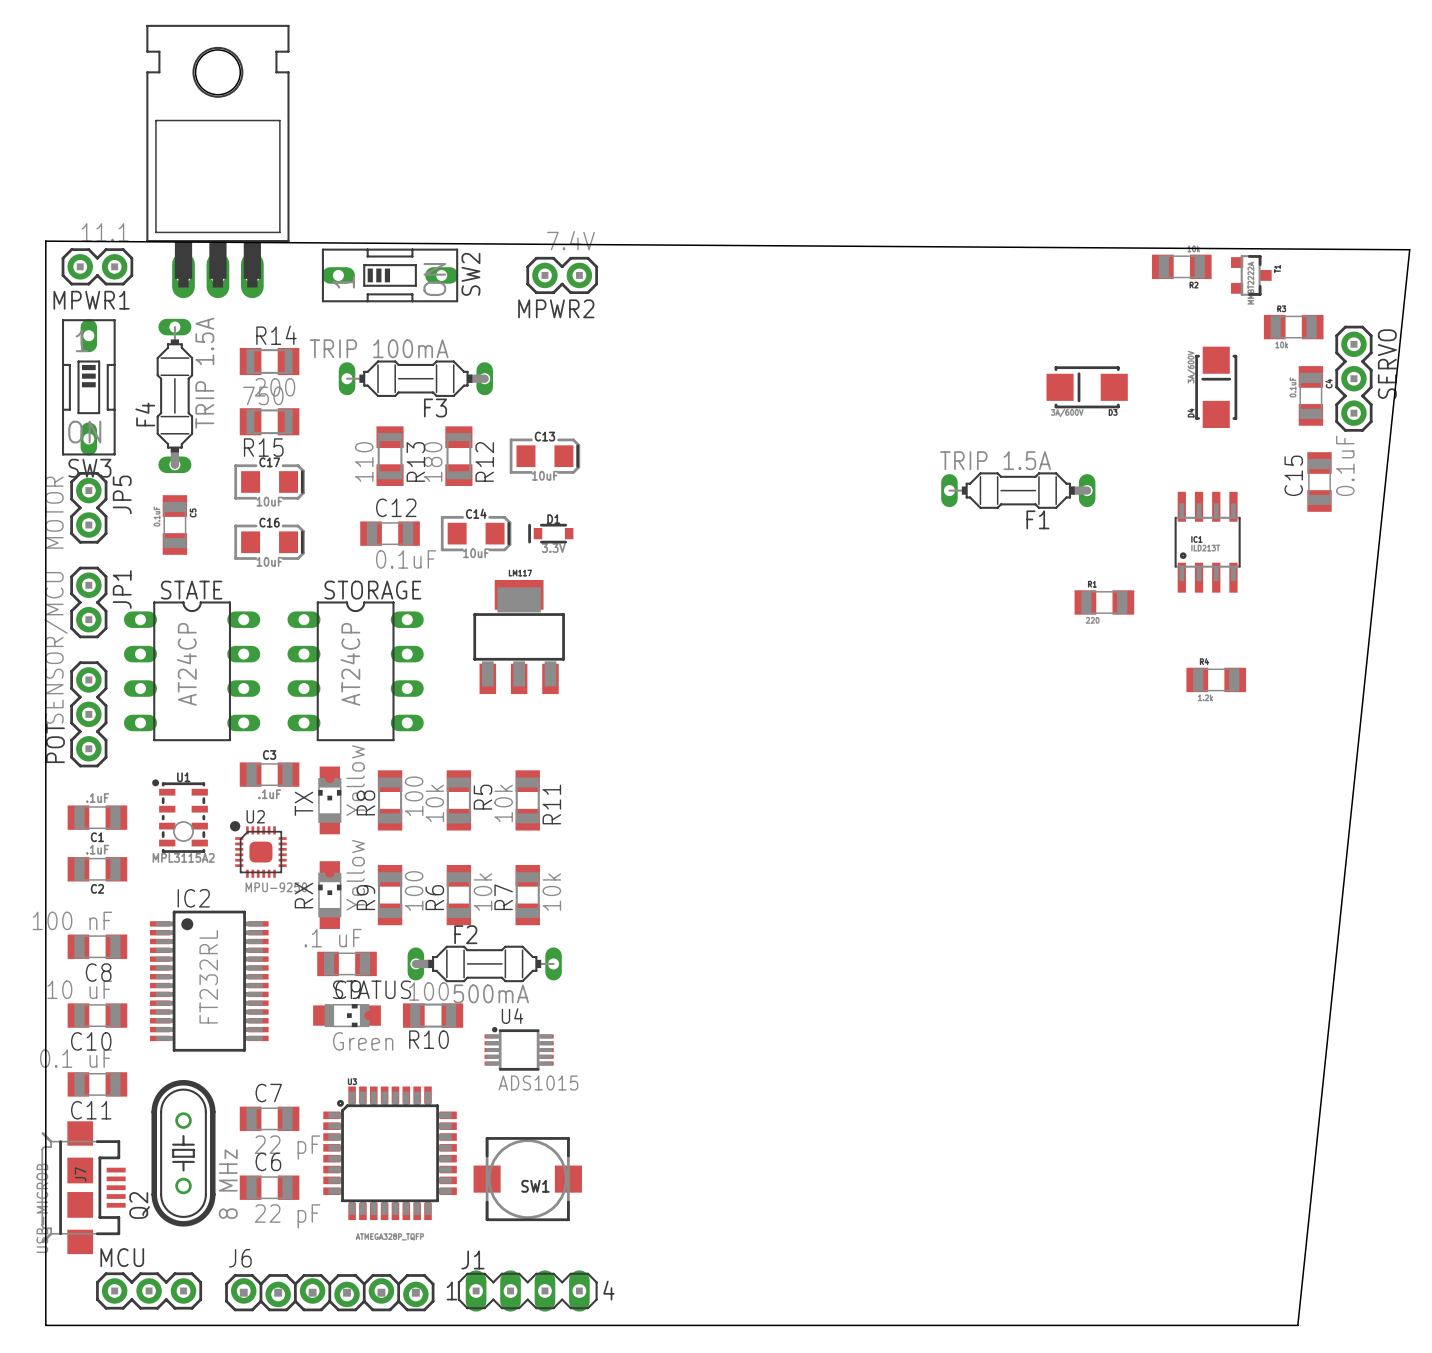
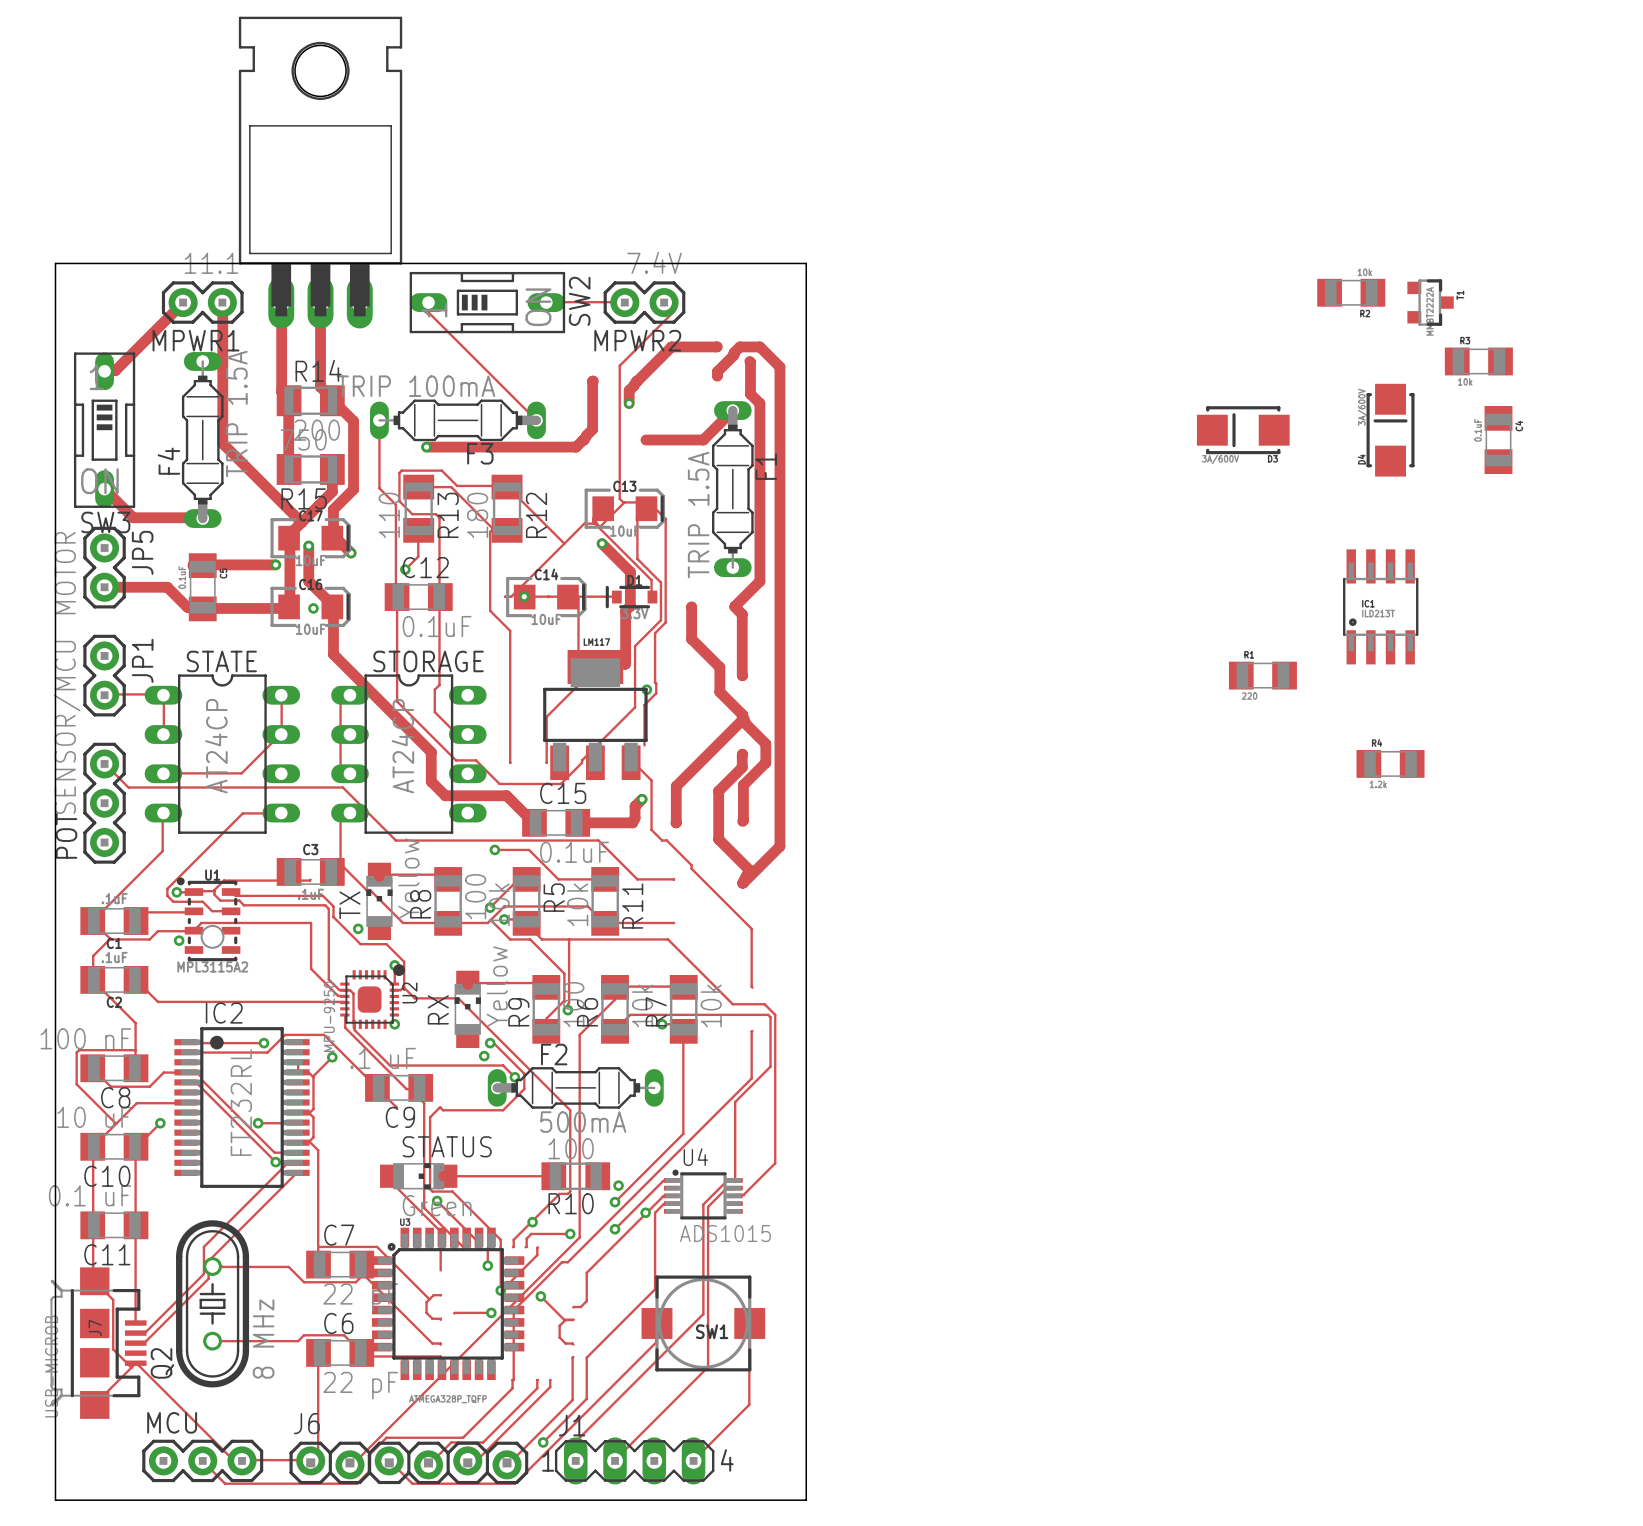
part position: (217, 161) -> (320, 172)
board edge: (45, 241) (1409, 249) (1297, 1325) (704, 1325) -> (55, 263) (806, 263) (806, 1500)
MPWR1 position: (97, 266) -> (202, 302)
track: none -> (183, 302) (115, 370) (104, 371)
track: none -> (222, 302) (222, 443) (301, 522)
track: none -> (281, 302) (281, 391) (289, 400) (289, 469)
track: none -> (320, 302) (320, 387) (353, 421) (353, 489) (333, 509) (332, 538) (338, 540) (351, 553)
track: none -> (428, 302) (428, 312) (536, 420)
SW2 position: (390, 275) -> (487, 302)
track: none -> (546, 302) (634, 302)
track: none -> (673, 302) (673, 311) (619, 365) (619, 498) (623, 503)
track: none -> (717, 346) (671, 346) (629, 390) (629, 403)
track: none -> (749, 361) (750, 394) (759, 403) (759, 581) (734, 606) (742, 614) (742, 675)
track: none -> (717, 376) (717, 371) (739, 346) (759, 346) (779, 366) (779, 846) (742, 883) (749, 869) (718, 839) (718, 791) (742, 767) (742, 754)
track: none -> (593, 381) (592, 429) (576, 447) (426, 447)
via: none -> (629, 403)
track: none -> (732, 410) (703, 440) (645, 440)
track: none -> (379, 420) (379, 488) (395, 504) (397, 701) (456, 760) (476, 760) (499, 783) (560, 783) (635, 707) (635, 646) (660, 620) (660, 582) (637, 558) (636, 518)
F3 position: (415, 378) -> (457, 420)
SERVO: (1353, 378) -> none
via: none -> (426, 447)
track: none -> (332, 469) (332, 491) (291, 533) (289, 538) (289, 606) (192, 608) (187, 607) (167, 587) (104, 587)
track: none -> (418, 487) (451, 487) (493, 529) (507, 530) (492, 529) (490, 531) (490, 610) (510, 630) (510, 762)
track: none -> (104, 489) (133, 517) (192, 518)
R13 position: (390, 456) -> (418, 508)
R12 position: (458, 456) -> (507, 508)
track: none -> (593, 518) (593, 522) (651, 580) (652, 597)
track: none -> (593, 518) (593, 523) (584, 523) (511, 596) (505, 597)
track: none -> (593, 518) (599, 527) (624, 502) (649, 502) (665, 518) (665, 622) (655, 633) (656, 693) (644, 705) (644, 745)
track: none -> (418, 530) (418, 556) (405, 569)
C15 rotation: 0° (1319, 481) -> 90° clockwise (556, 822)
C15 position: (1319, 481) -> (556, 822)
track: none -> (564, 543) (506, 485) (457, 485) (441, 470) (401, 470) (399, 472) (399, 501) (412, 514) (435, 514) (439, 517) (439, 685) (434, 689) (434, 712) (457, 734)
track: none -> (602, 543) (630, 571) (630, 606) (625, 610) (624, 664)
via: none -> (602, 543)
track: none -> (308, 546) (308, 581) (333, 607) (333, 654) (431, 752) (431, 781) (445, 795) (506, 795) (534, 822)
via: none -> (308, 546)
F1 rotation: 0° (1018, 490) -> 90° counterclockwise (732, 489)
F1 position: (1018, 490) -> (732, 489)
via: none -> (351, 553)
track: none -> (275, 564) (192, 565)
via: none -> (275, 564)
via: none -> (405, 569)
C12 position: (390, 533) -> (418, 597)
track: none -> (524, 596) (616, 597)
via: none -> (524, 596)
track: none -> (578, 596) (578, 685) (546, 716) (546, 762)
track: none -> (691, 606) (691, 639) (719, 667) (719, 692) (742, 714)
via: none -> (313, 608)
via: none -> (646, 689)
track: none -> (104, 695) (162, 694) (163, 734)
track: none -> (281, 695) (281, 734) (241, 773) (163, 773)
track: none -> (340, 695) (340, 773)
track: none -> (742, 714) (742, 720) (676, 786) (675, 822)
track: none -> (742, 714) (745, 723) (765, 743) (765, 762) (743, 785) (742, 821)
track: none -> (624, 745) (625, 754) (651, 780) (651, 829) (662, 840) (666, 840) (691, 865) (691, 868) (751, 928) (752, 987)
track: none -> (104, 763) (128, 787) (342, 787) (395, 840) (598, 840) (637, 879) (673, 879)
track: none -> (642, 799) (635, 806) (635, 818) (632, 822) (577, 822)
via: none -> (642, 799)
track: none -> (163, 813) (162, 851) (93, 921) (110, 939) (149, 939) (157, 931) (193, 931) (201, 922) (310, 923) (311, 968) (338, 996) (344, 996)
track: none -> (281, 813) (242, 813) (167, 888) (167, 895) (173, 901) (202, 901) (212, 911) (231, 911)
track: none -> (340, 813) (340, 864) (402, 922) (487, 922) (504, 906) (587, 906) (605, 923) (673, 922)
track: none -> (494, 849) (529, 849) (558, 879) (605, 879)
via: none -> (494, 849)
track: none -> (379, 874) (443, 874) (448, 879)
track: none -> (310, 879) (223, 880) (213, 891) (176, 892)
track: none -> (526, 879) (517, 880) (490, 907)
track: none -> (213, 890) (214, 894) (220, 900) (239, 900) (243, 905) (325, 905) (328, 908) (328, 979) (339, 990) (349, 990) (353, 993) (354, 1030) (390, 1065) (503, 1065) (514, 1077)
via: none -> (176, 892)
track: none -> (231, 892) (235, 895) (322, 895) (333, 906) (333, 917) (360, 944) (386, 944) (404, 961) (404, 986) (400, 990) (394, 990)
via: none -> (490, 907)
track: none -> (194, 911) (145, 912) (136, 921)
track: none -> (490, 920) (510, 939) (530, 939) (564, 973) (564, 1000) (546, 1018) (546, 1031)
track: none -> (504, 919) (523, 919) (541, 939) (668, 939) (732, 1004) (764, 1004) (775, 1014) (775, 1163) (743, 1195) (735, 1195)
via: none -> (504, 919)
via: none -> (358, 928)
track: none -> (110, 938) (93, 955) (92, 979) (135, 1023) (136, 1068)
track: none -> (569, 939) (567, 1010)
via: none -> (179, 940)
U2 rotation: 0° (258, 849) -> 90° clockwise (372, 996)
U2 position: (258, 849) -> (372, 996)
track: none -> (394, 965) (394, 984)
via: none -> (394, 965)
track: none -> (136, 979) (157, 1001) (344, 1002)
track: none -> (467, 982) (541, 983) (546, 987)
track: none -> (403, 987) (414, 998) (458, 998) (570, 1110) (570, 1191) (567, 1193) (559, 1193) (513, 1239) (513, 1247)
track: none -> (683, 987) (615, 986) (615, 999) (579, 1034) (579, 1237) (352, 1464) (349, 1464)
RX position: (329, 895) -> (467, 1009)
R9 position: (390, 895) -> (546, 1009)
R6 position: (458, 895) -> (615, 1009)
via: none -> (567, 1010)
R7 position: (527, 895) -> (683, 1009)
track: none -> (344, 1015) (345, 1027) (406, 1089) (410, 1089) (424, 1103) (424, 1208) (463, 1247)
via: none -> (394, 1024)
track: none -> (662, 1024) (675, 1024) (683, 1031) (683, 1133) (615, 1202)
via: none -> (662, 1024)
track: none -> (615, 1031) (630, 1014) (768, 1014) (770, 1017) (770, 1066) (735, 1102) (735, 1180) (726, 1180) (703, 1204) (703, 1314) (576, 1441) (575, 1460)
track: none -> (752, 1031) (751, 1078) (567, 1262) (562, 1262) (513, 1310) (512, 1388) (463, 1437) (386, 1437) (368, 1455) (368, 1471) (357, 1483) (225, 1483) (202, 1460)
track: none -> (185, 1042) (263, 1043)
via: none -> (263, 1043)
track: none -> (490, 1043) (493, 1043) (524, 1073) (524, 1089) (503, 1110) (443, 1110) (440, 1107) (430, 1117) (430, 1189) (432, 1191) (452, 1191) (500, 1239) (500, 1290)
via: none -> (490, 1043)
track: none -> (135, 1050) (79, 1050) (76, 1052) (76, 1084) (116, 1123)
track: none -> (185, 1052) (267, 1052) (285, 1034) (324, 1034) (397, 1107)
via: none -> (484, 1056)
track: none -> (332, 1057) (312, 1076)
via: none -> (332, 1057)
track: none -> (298, 1062) (298, 1072) (307, 1071) (313, 1077) (313, 1109) (309, 1113)
track: none -> (92, 1068) (110, 1086) (149, 1086) (163, 1072) (196, 1072) (201, 1079) (274, 1152) (298, 1152)
via: none -> (514, 1077)
track: none -> (185, 1082) (196, 1083) (275, 1162)
F2 position: (484, 963) -> (575, 1087)
track: none -> (185, 1102) (136, 1103) (93, 1146)
track: none -> (298, 1112) (308, 1112) (313, 1117) (313, 1137) (308, 1142) (298, 1142)
track: none -> (160, 1123) (135, 1146) (135, 1323)
via: none -> (160, 1123)
via: none -> (258, 1123)
track: none -> (298, 1122) (258, 1123)
track: none -> (309, 1141) (318, 1150) (318, 1264)
track: none -> (93, 1146) (93, 1279) (113, 1299) (113, 1349) (131, 1367)
STATUS position: (347, 1015) -> (418, 1176)
R10 position: (433, 1015) -> (575, 1176)
via: none -> (275, 1162)
track: none -> (298, 1162) (287, 1163) (203, 1246) (203, 1274) (145, 1332) (135, 1333)
track: none -> (298, 1172) (208, 1261) (208, 1278) (145, 1342) (135, 1343)
track: none -> (391, 1176) (392, 1183) (440, 1231) (440, 1270)
track: none -> (445, 1176) (553, 1176)
track: none -> (671, 1180) (663, 1180) (615, 1229)
U4 position: (519, 1048) -> (703, 1194)
via: none -> (618, 1185)
track: none -> (735, 1188) (725, 1189) (708, 1206) (708, 1367) (615, 1460)
track: none -> (671, 1195) (663, 1196) (586, 1272) (586, 1301) (580, 1306) (573, 1307)
track: none -> (437, 1200) (476, 1239) (476, 1247)
via: none -> (437, 1200)
via: none -> (615, 1202)
track: none -> (671, 1203) (663, 1204) (655, 1212) (655, 1289) (586, 1357) (586, 1398) (543, 1442)
via: none -> (645, 1212)
via: none -> (532, 1222)
via: none -> (615, 1229)
track: none -> (570, 1233) (531, 1233) (526, 1238) (525, 1247)
via: none -> (570, 1233)
track: none -> (318, 1246) (377, 1246) (429, 1299)
track: none -> (488, 1247) (487, 1265)
track: none -> (537, 1247) (537, 1255) (511, 1281)
C7 position: (269, 1118) -> (340, 1264)
via: none -> (487, 1265)
track: none -> (222, 1266) (288, 1266) (304, 1282) (355, 1282) (362, 1275) (361, 1264) (362, 1264) (362, 1274) (432, 1343) (440, 1344)
via: none -> (500, 1290)
track: none -> (440, 1295) (433, 1295) (426, 1302) (426, 1312) (432, 1318) (440, 1319)
track: none -> (540, 1296) (564, 1319) (573, 1319) (565, 1319) (559, 1325) (559, 1337) (565, 1343) (573, 1344)
via: none -> (540, 1296)
track: none -> (491, 1312) (454, 1313)
via: none -> (491, 1312)
track: none -> (656, 1323) (656, 1342) (514, 1483) (412, 1483) (389, 1460)
track: none -> (749, 1323) (749, 1404) (693, 1460)
SW1 position: (527, 1179) -> (703, 1323)
track: none -> (222, 1341) (298, 1341) (304, 1335) (344, 1335) (366, 1356) (440, 1356)
C6 position: (269, 1187) -> (340, 1352)
track: none -> (318, 1352) (318, 1453) (310, 1460) (233, 1460) (135, 1363) (94, 1404)
track: none -> (573, 1356) (572, 1400) (507, 1464)
track: none -> (537, 1380) (537, 1388) (483, 1442) (451, 1442) (428, 1464)
track: none -> (550, 1380) (550, 1387) (477, 1460) (467, 1460)
via: none -> (543, 1442)
MCU position: (149, 1290) -> (202, 1460)
J1 position: (527, 1290) -> (634, 1460)
J6 position: (329, 1292) -> (408, 1462)

